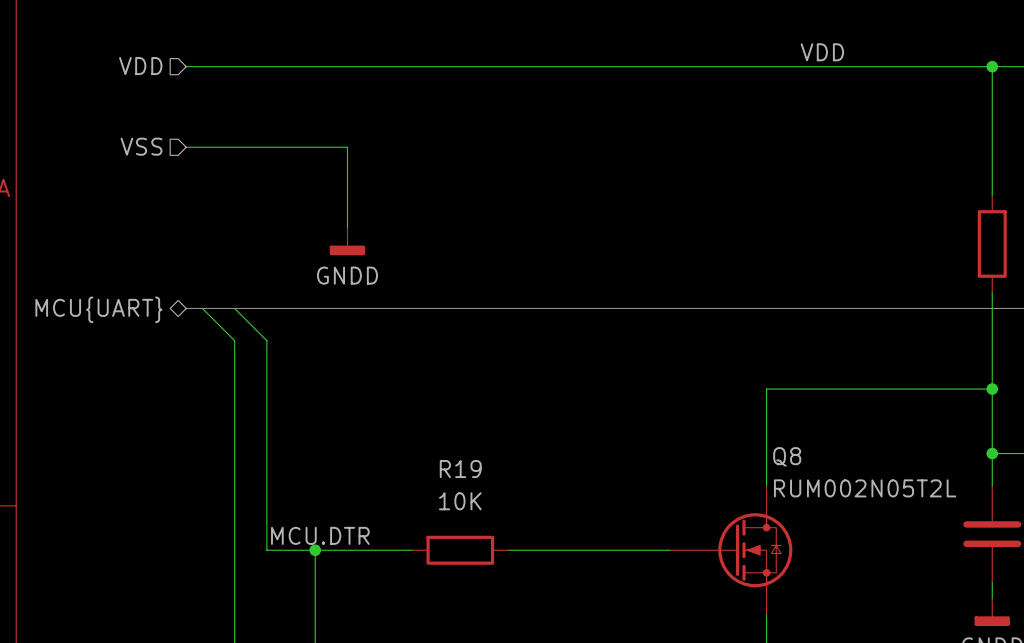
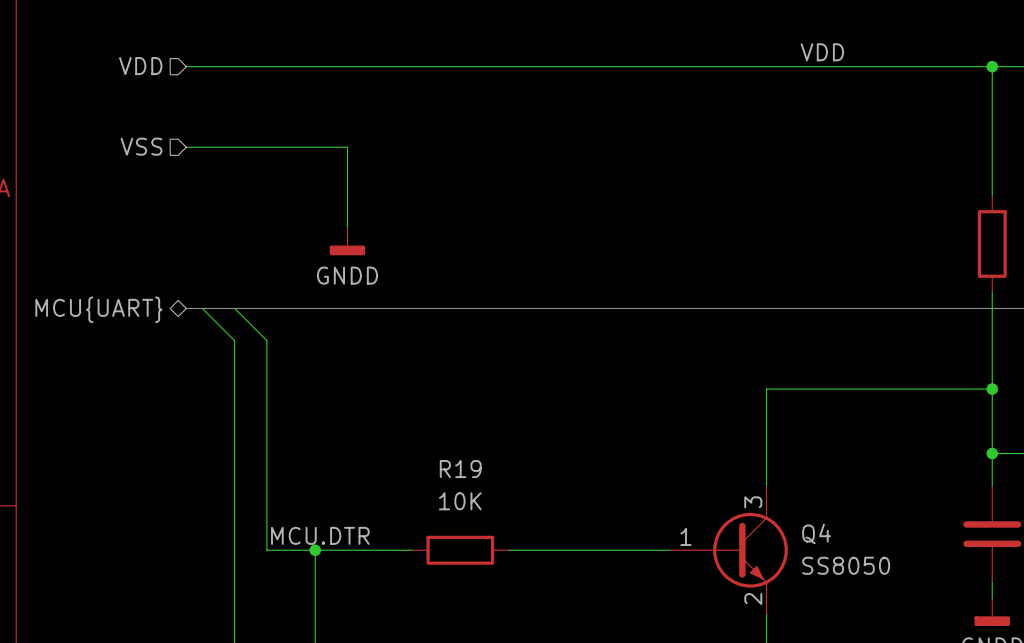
Q4: none -> SS8050 (728, 550)
Q8: RUM002N05T2L (731, 550) -> none

